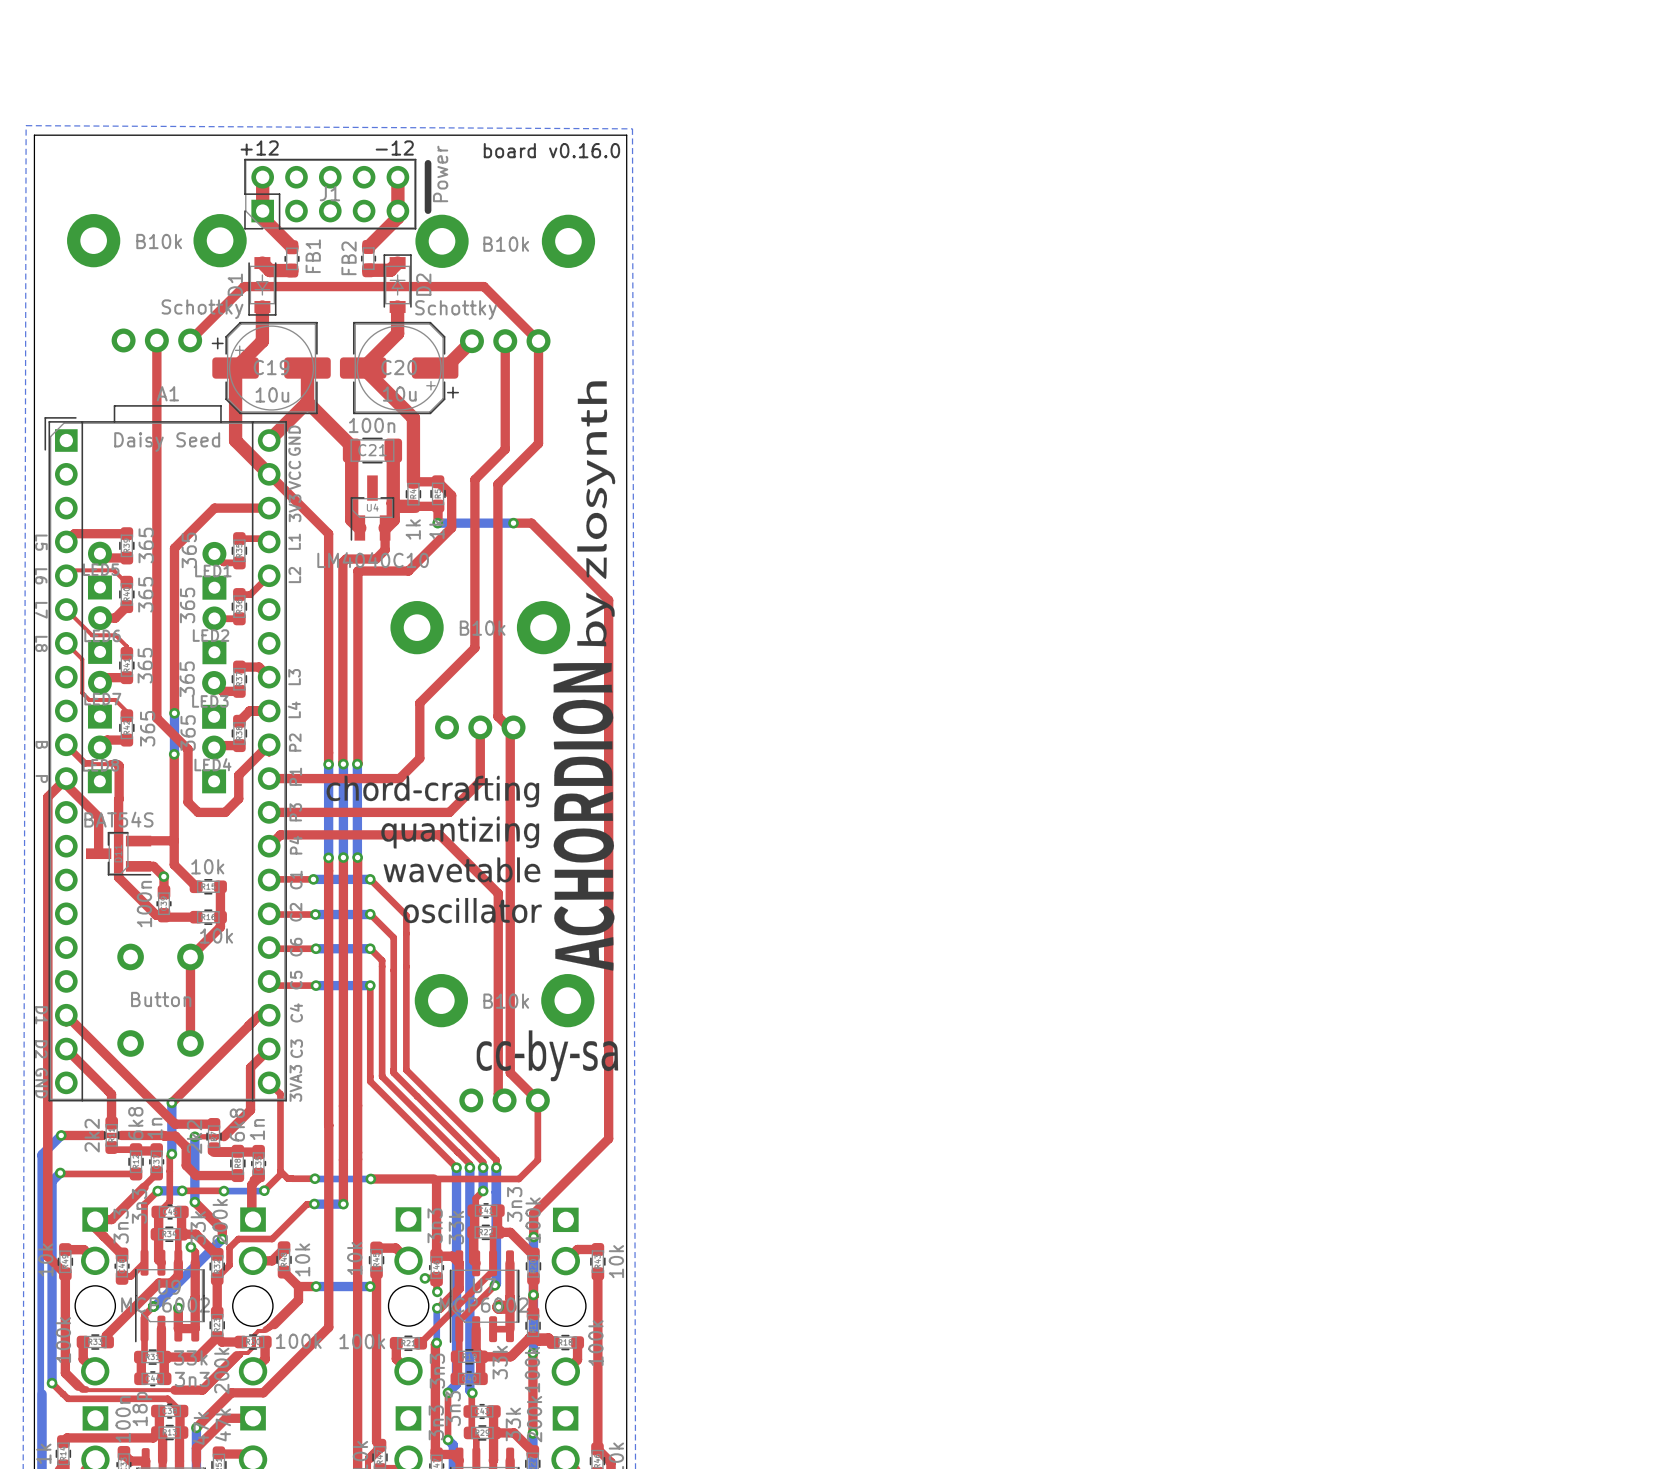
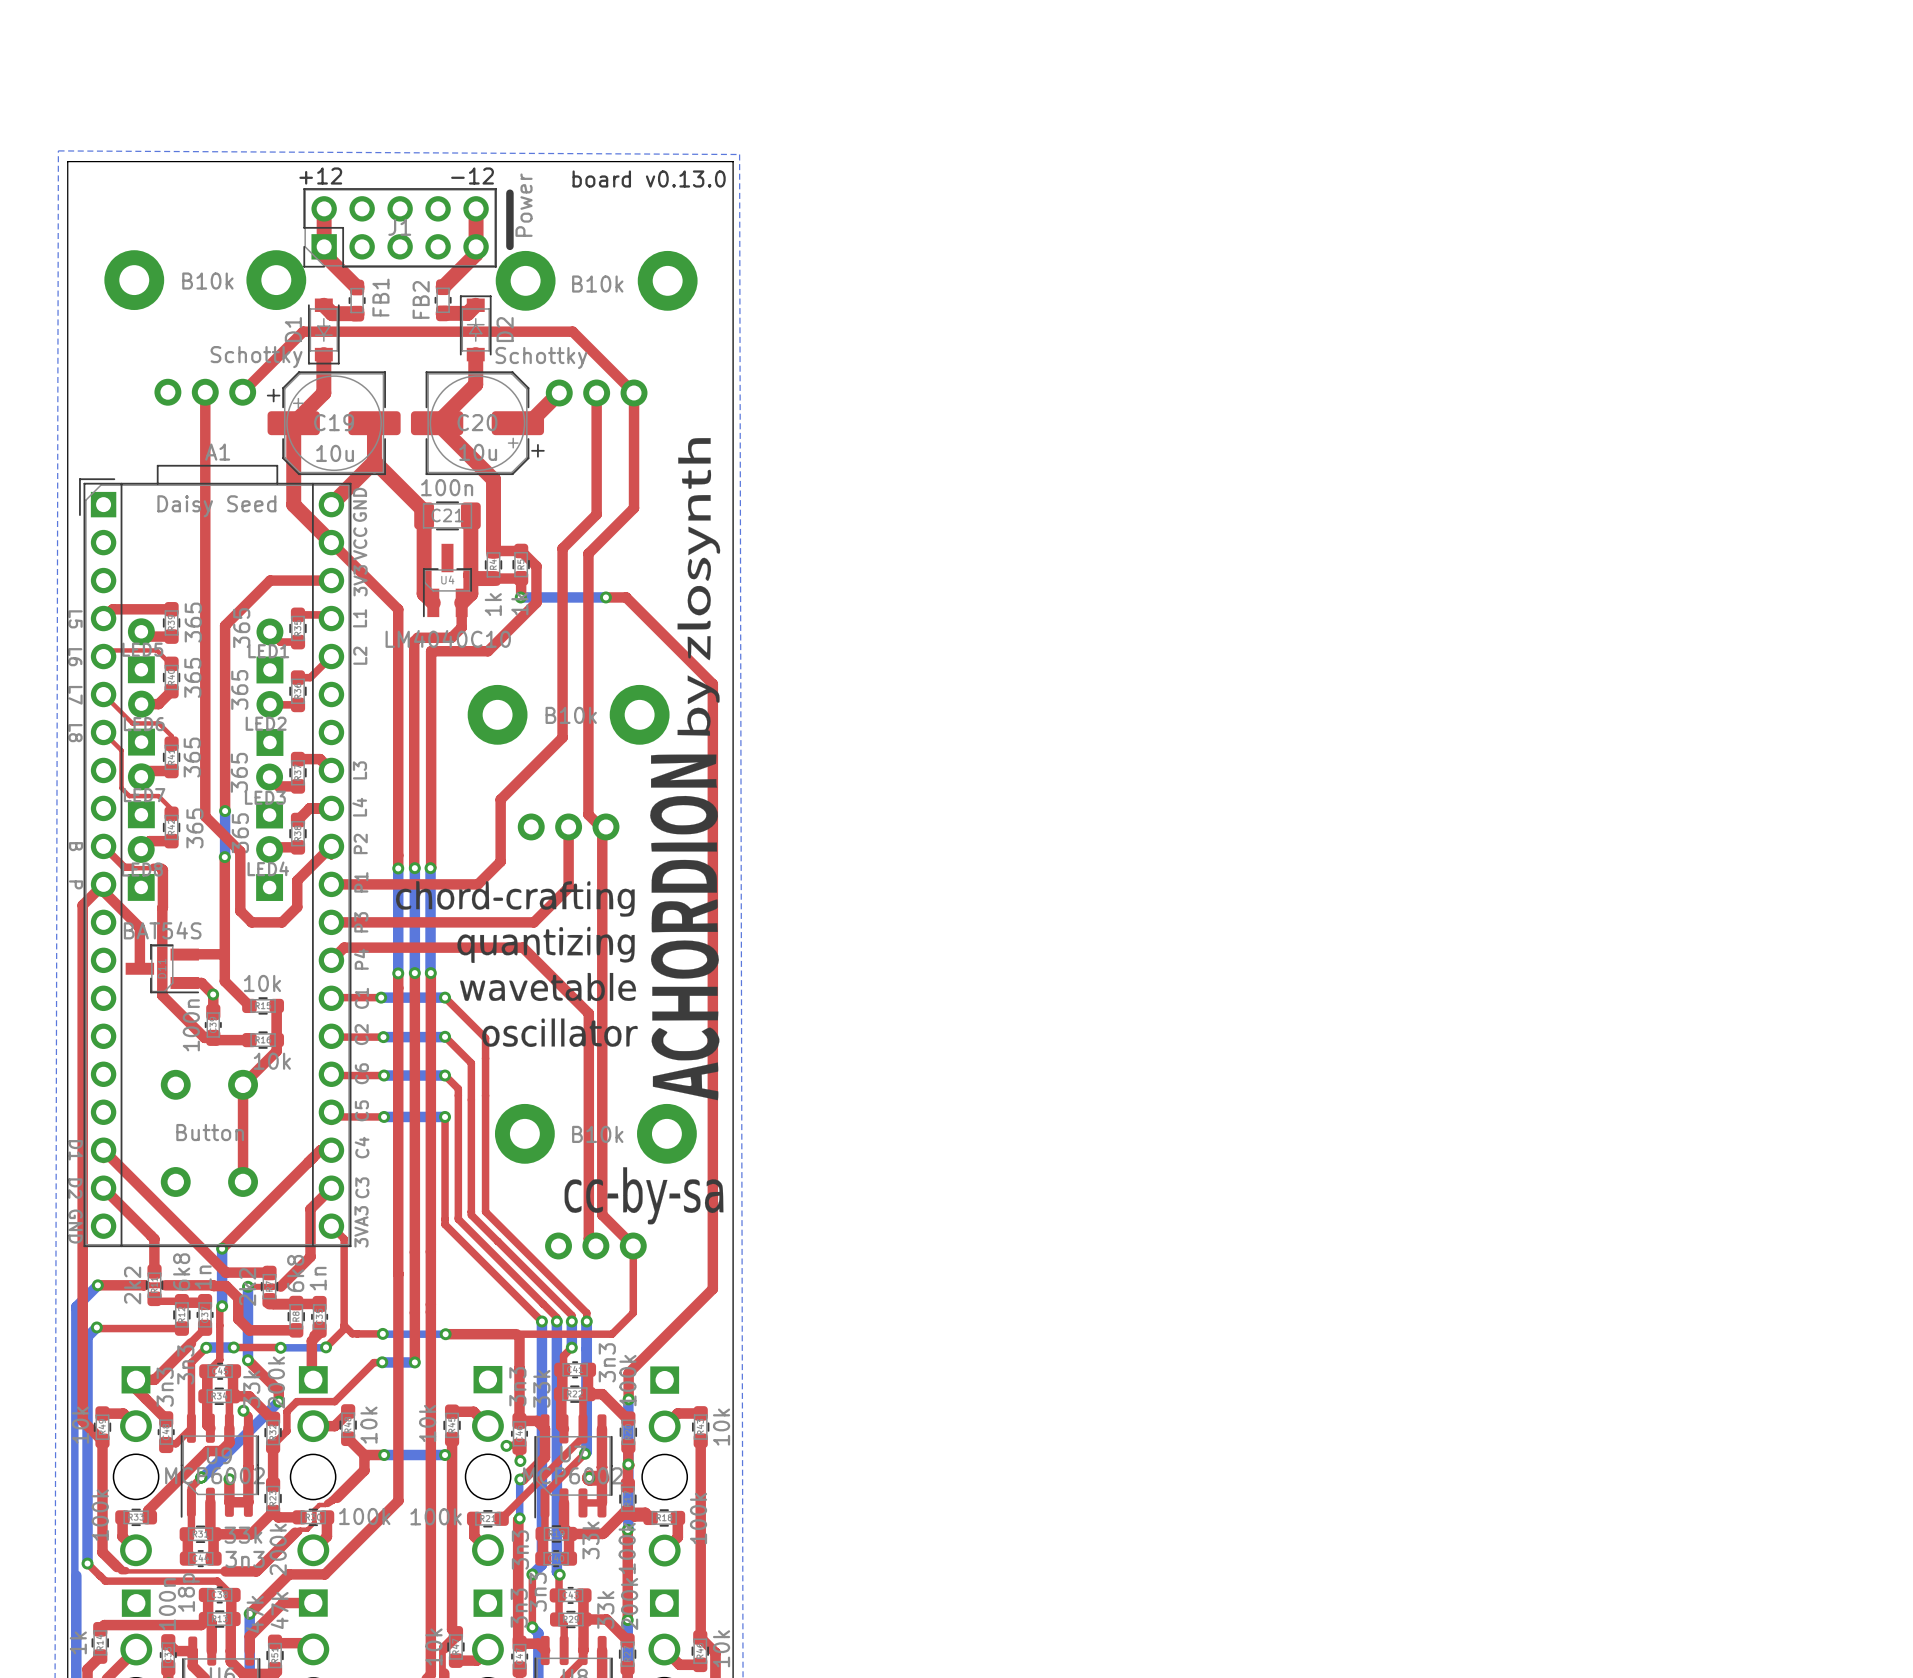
text: board v0.16.0 (551, 150) -> board v0.13.0 (649, 178)

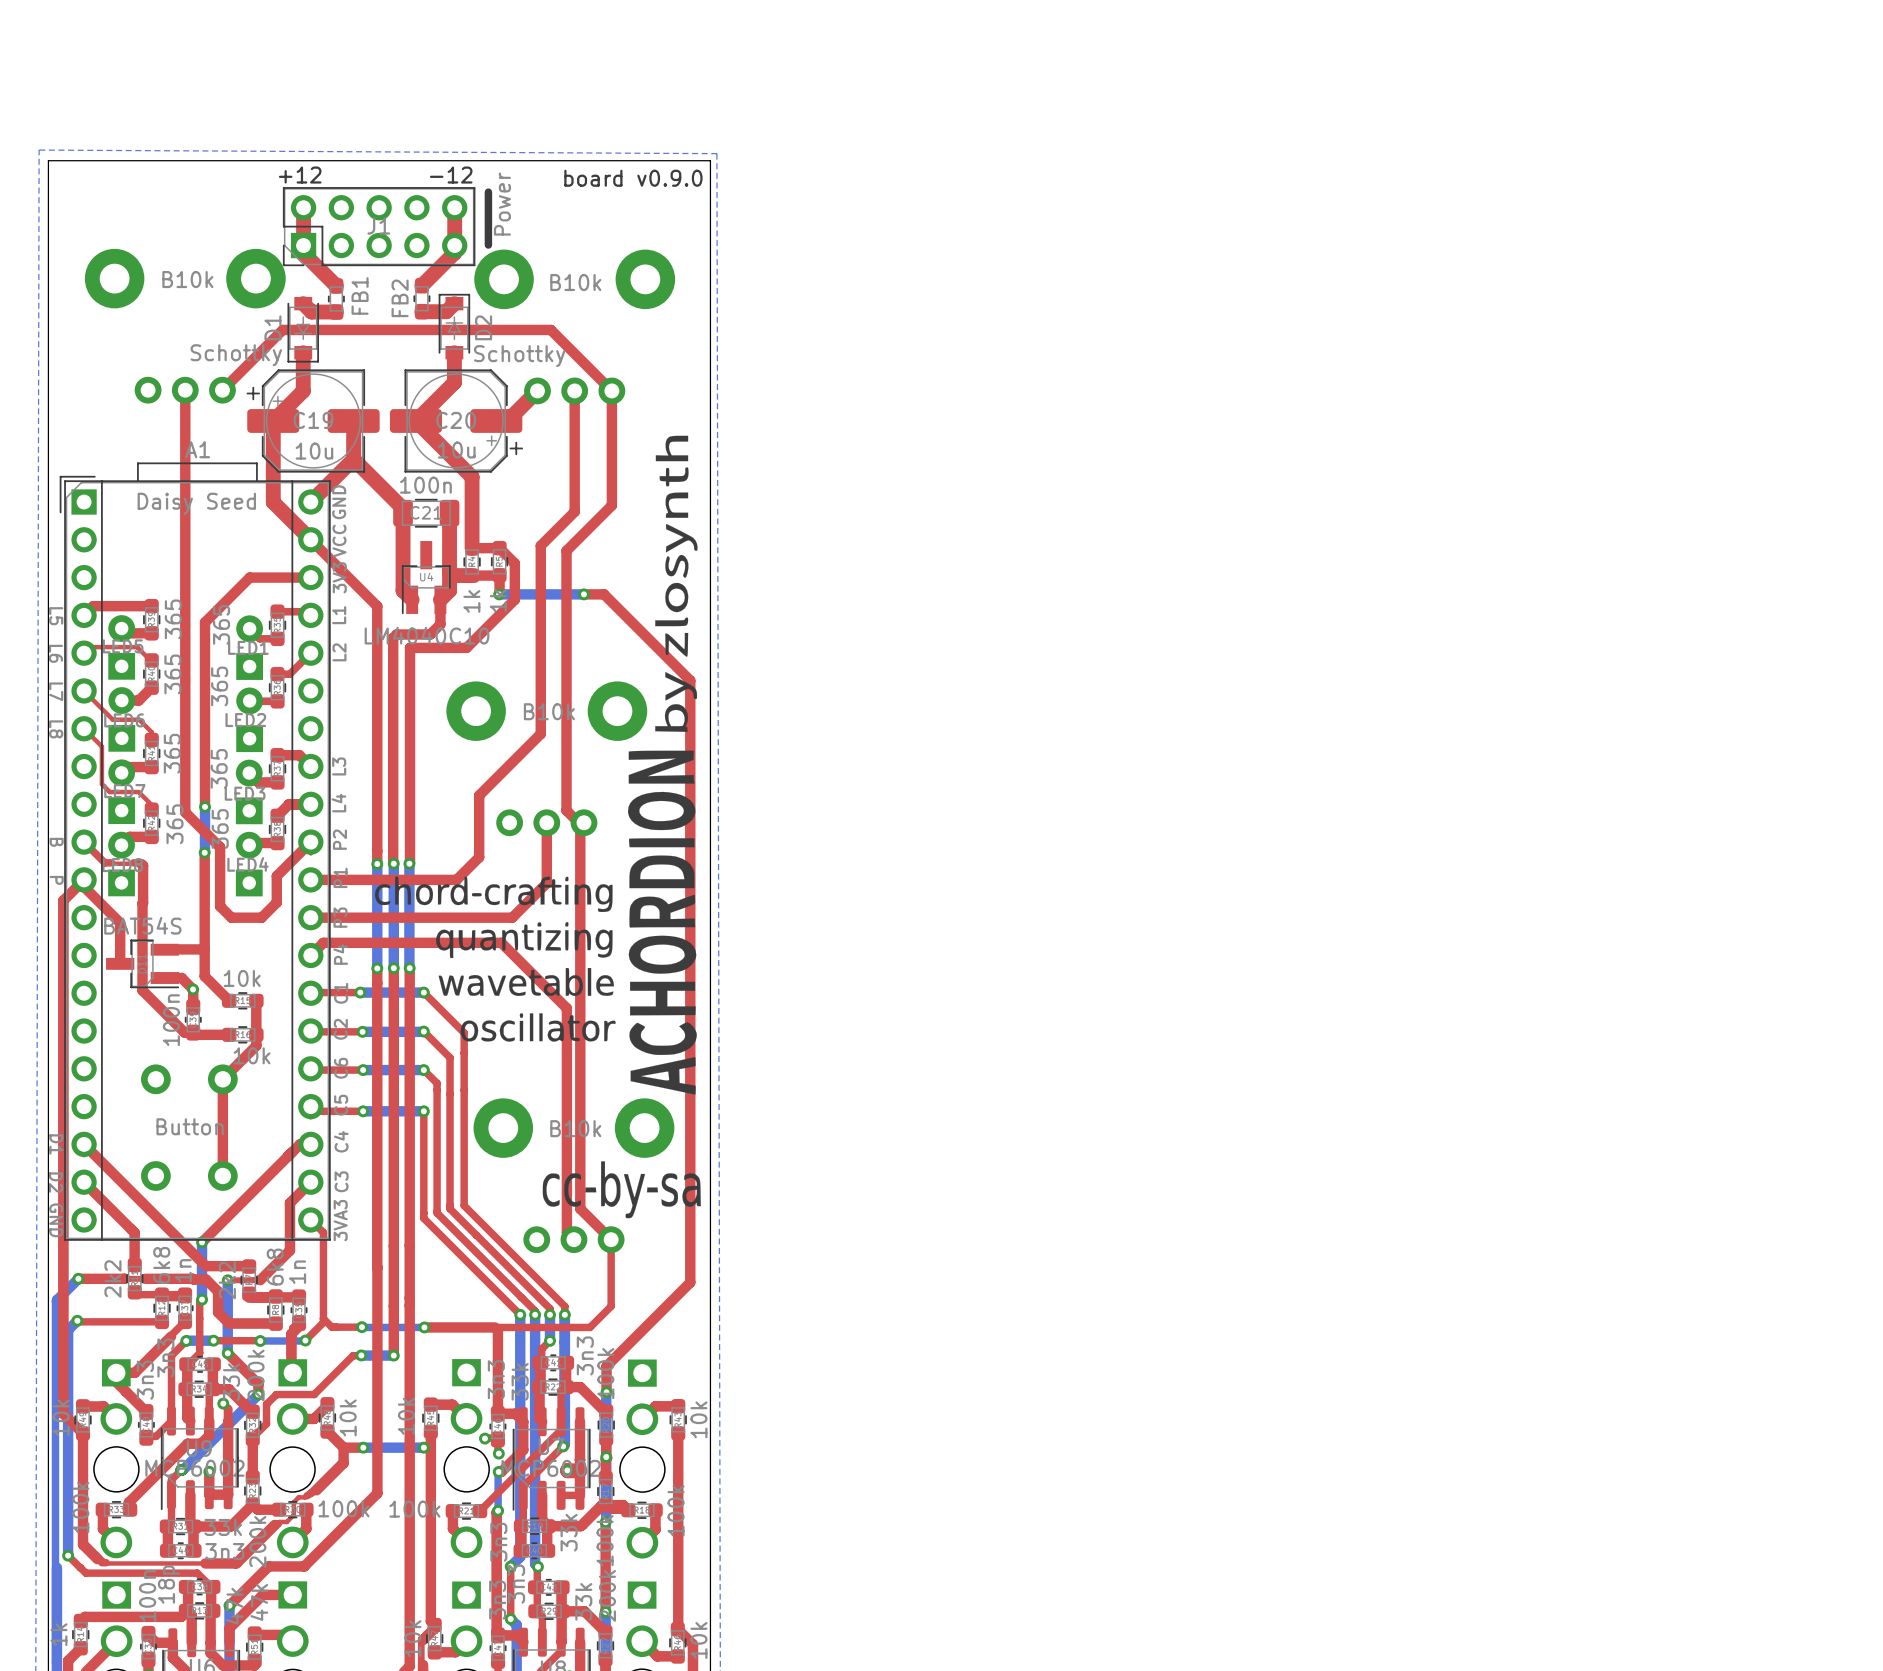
text: board v0.13.0 (649, 178) -> board v0.9.0 (633, 178)

